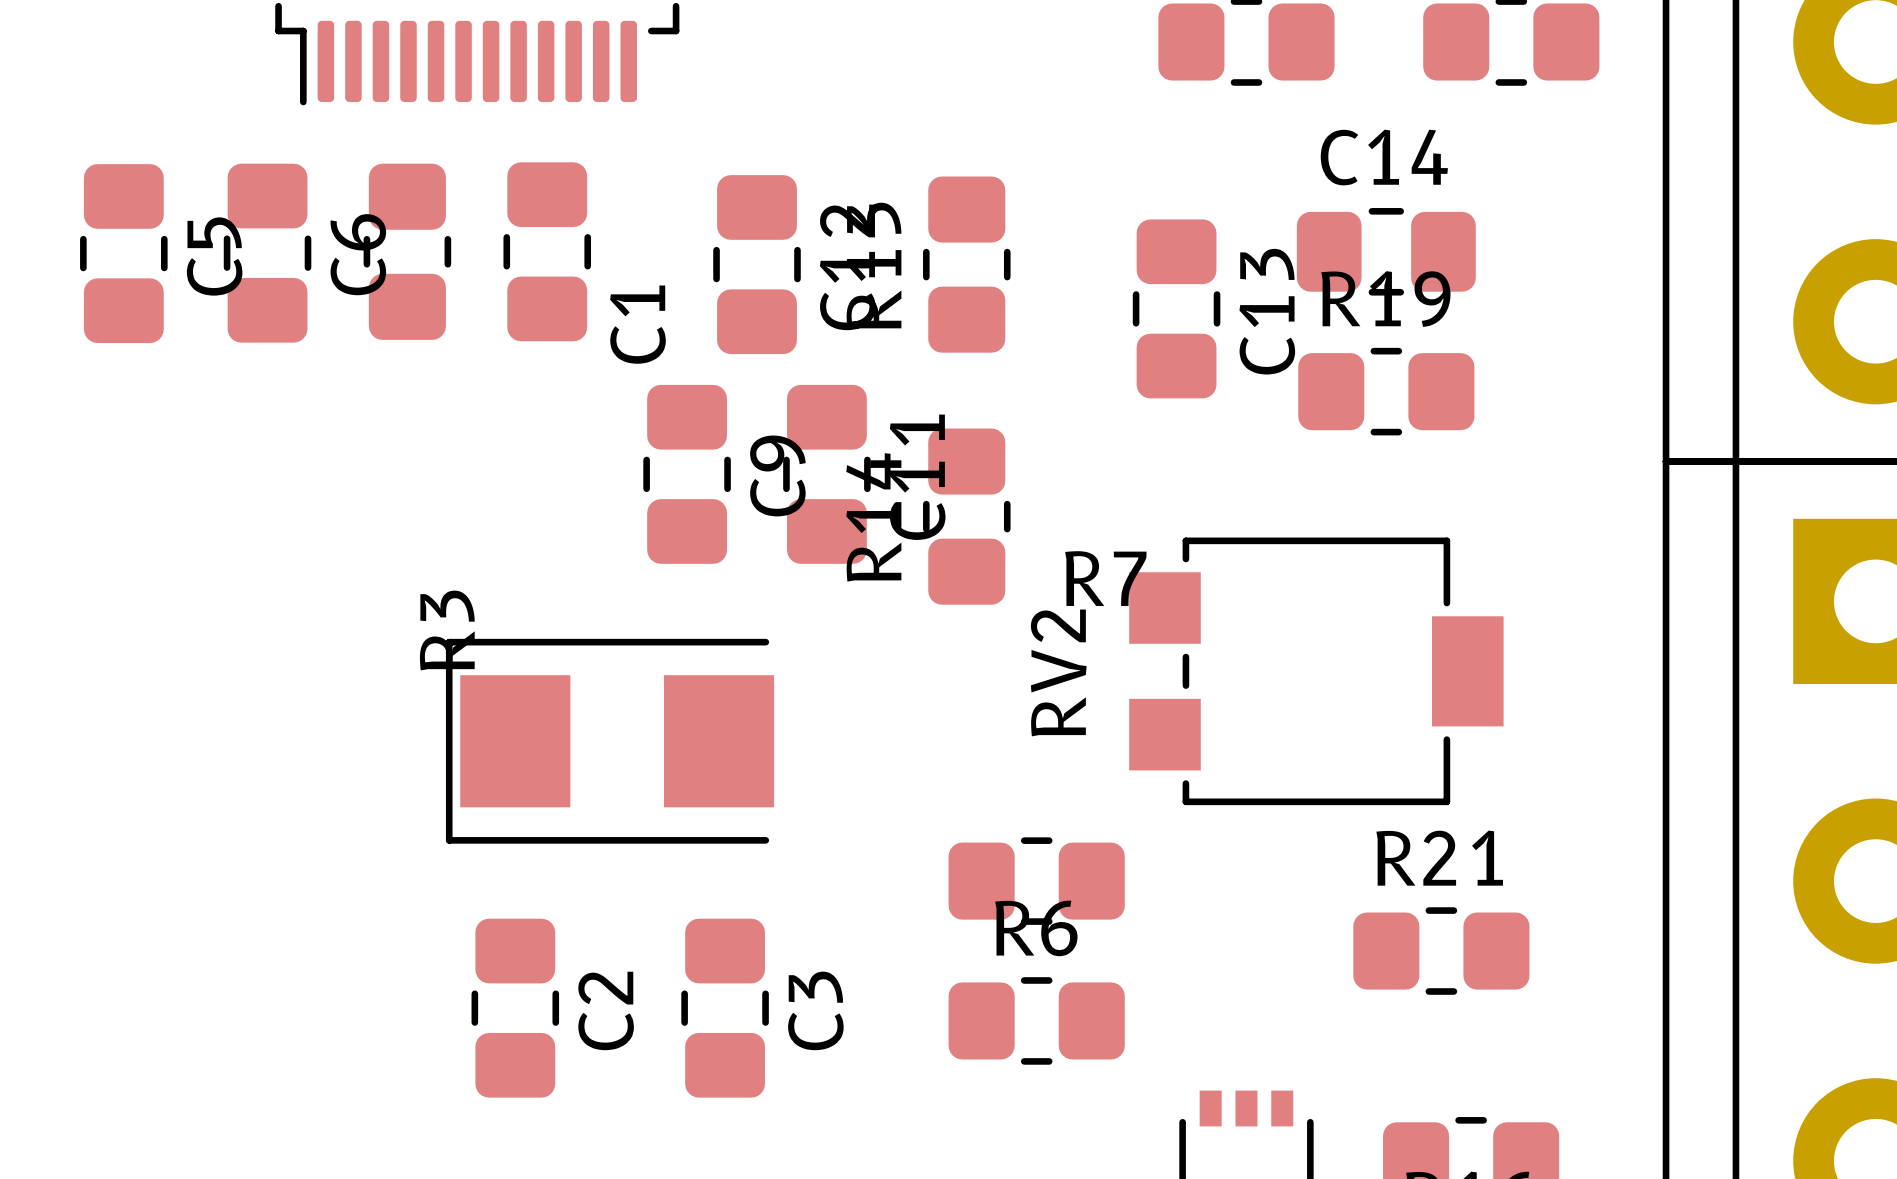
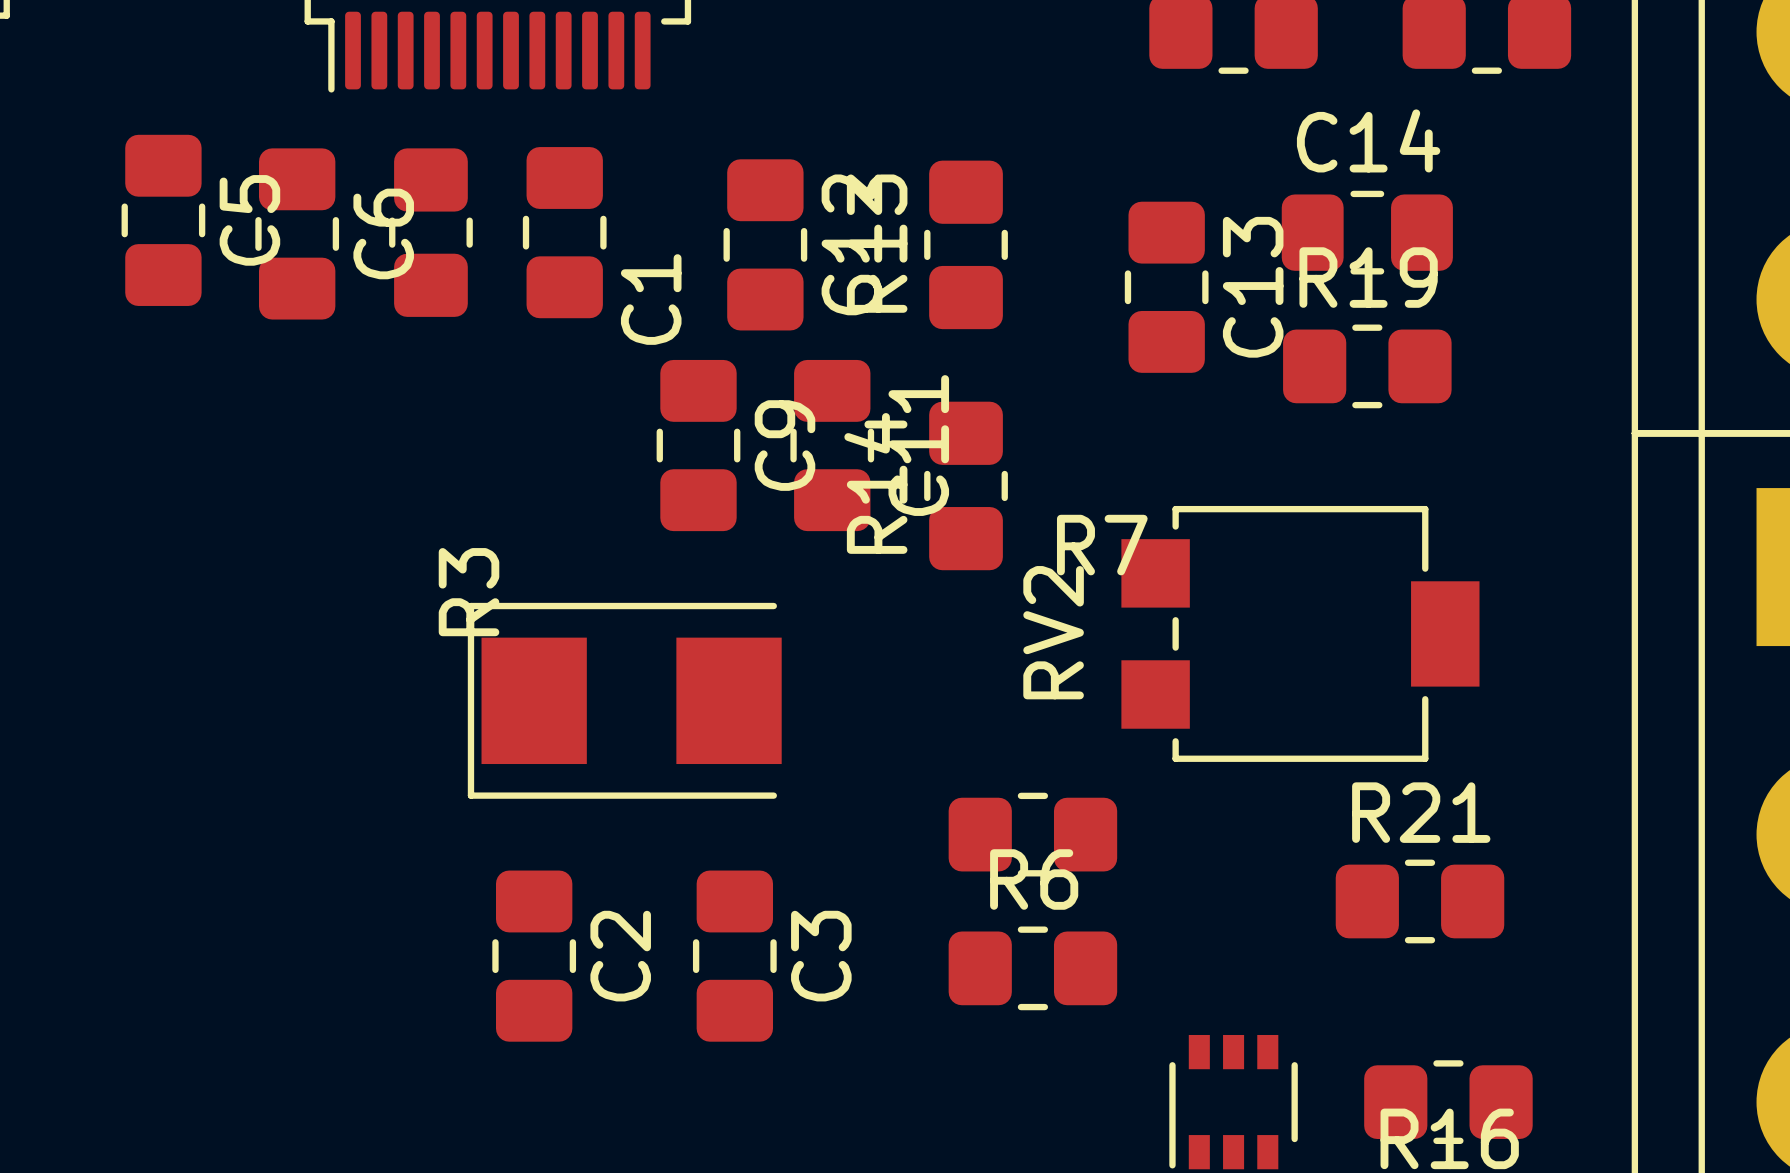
C5 position: (123, 253) -> (163, 220)

